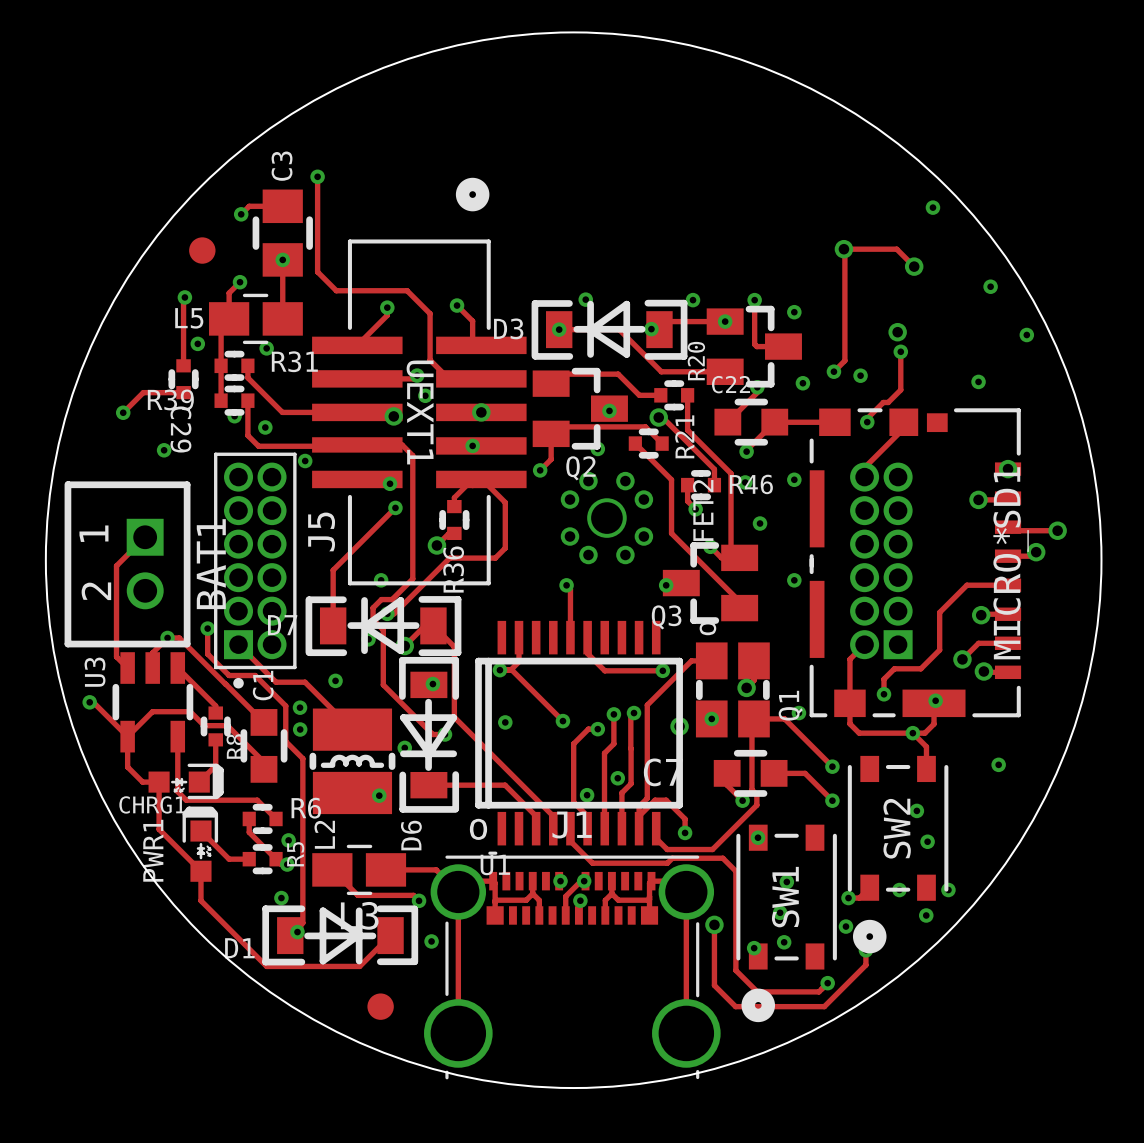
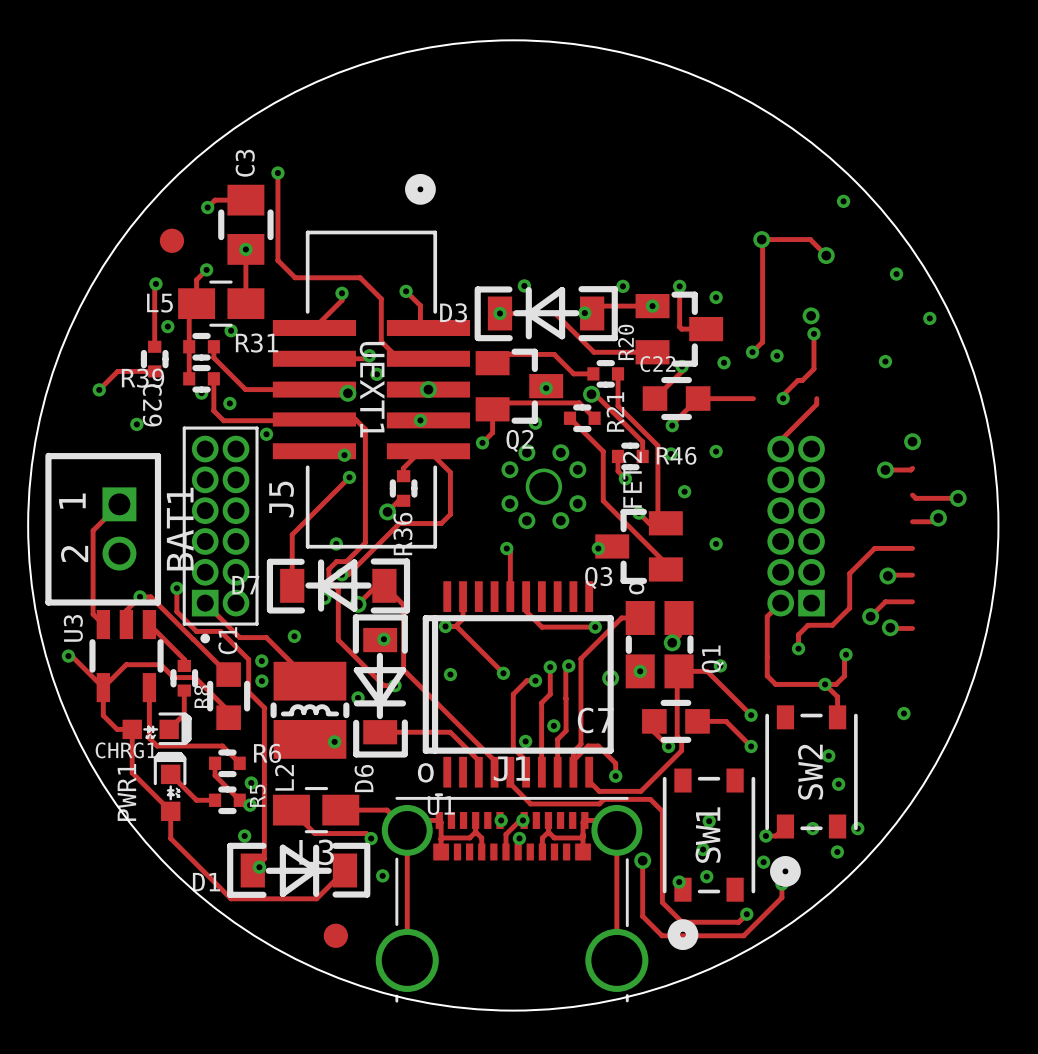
MICRO_SD1: (915, 562) -> none
via: (757, 837) -> none

